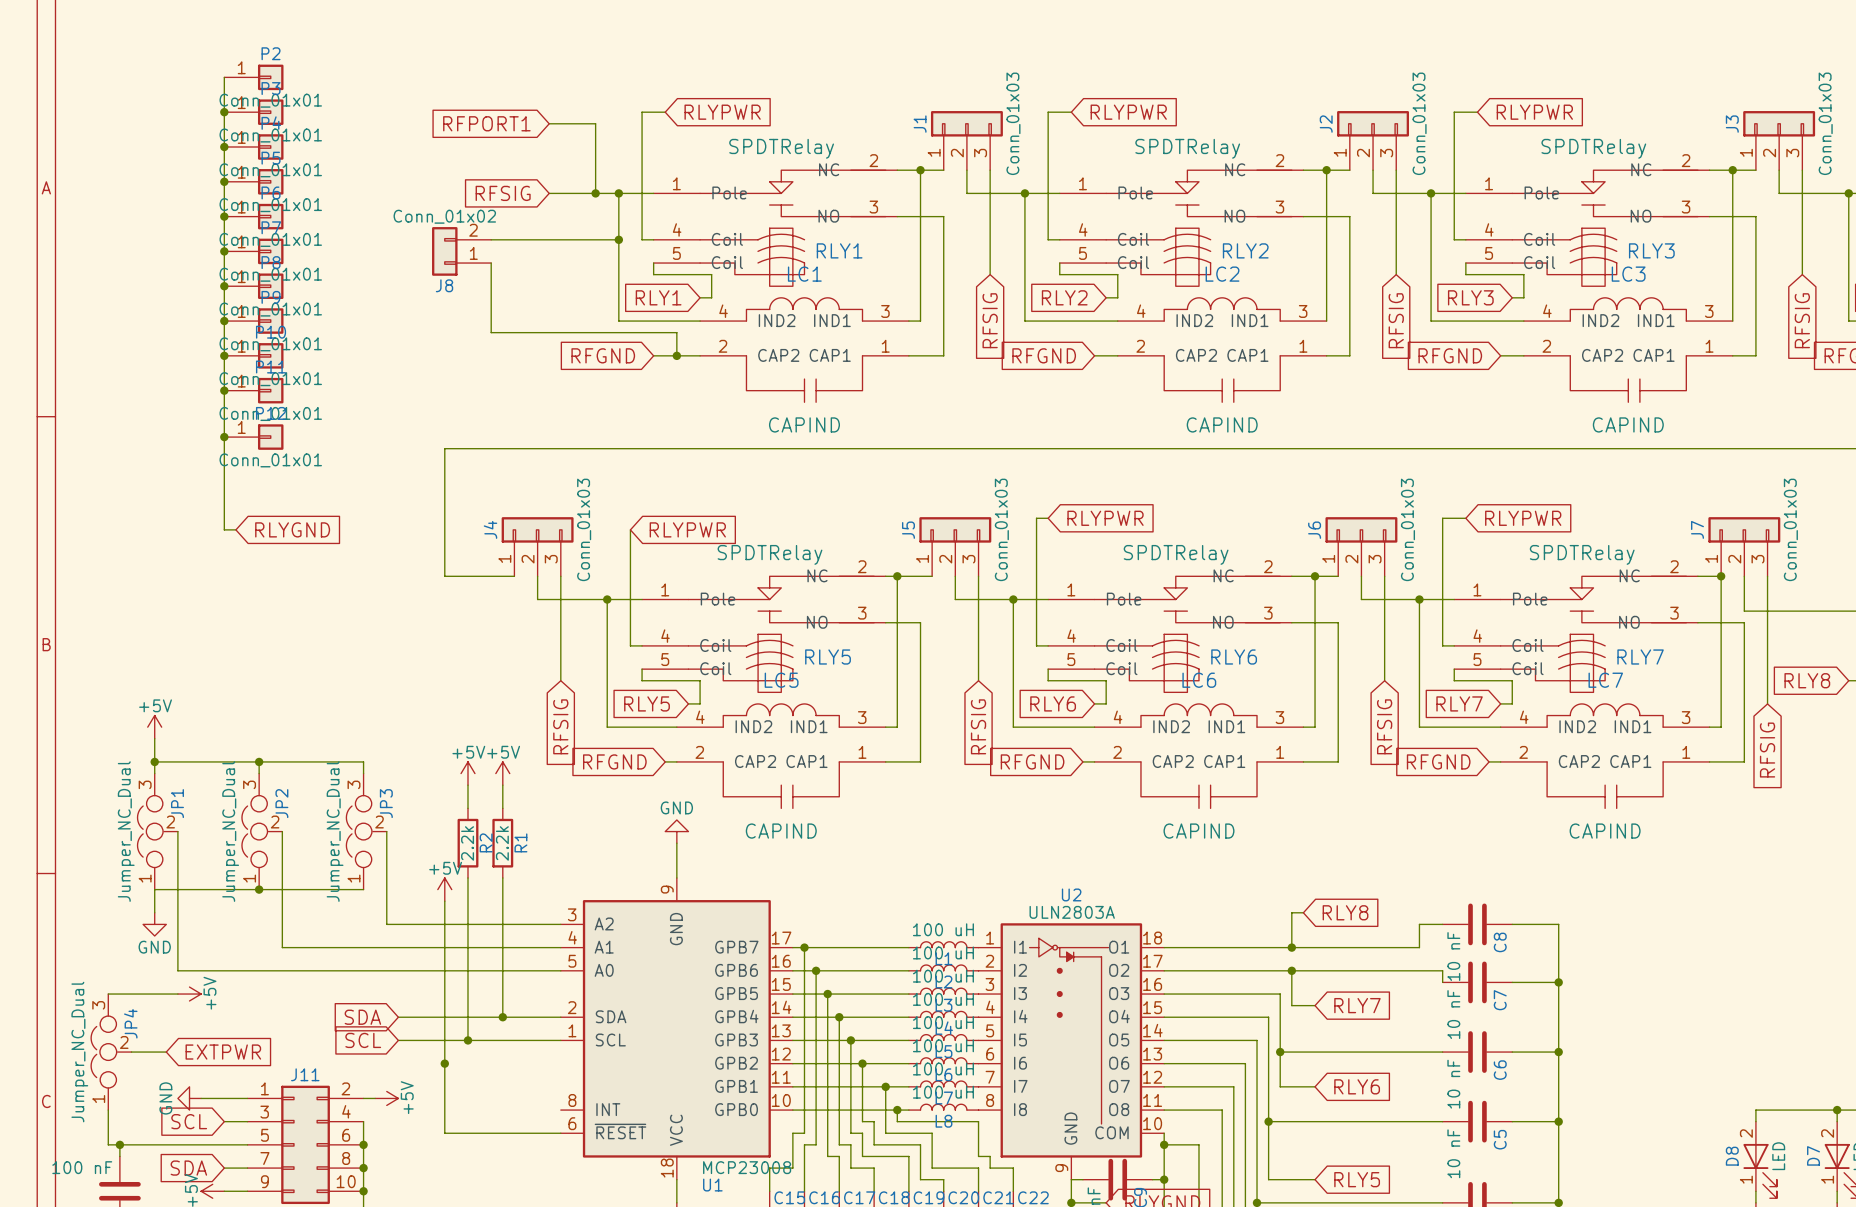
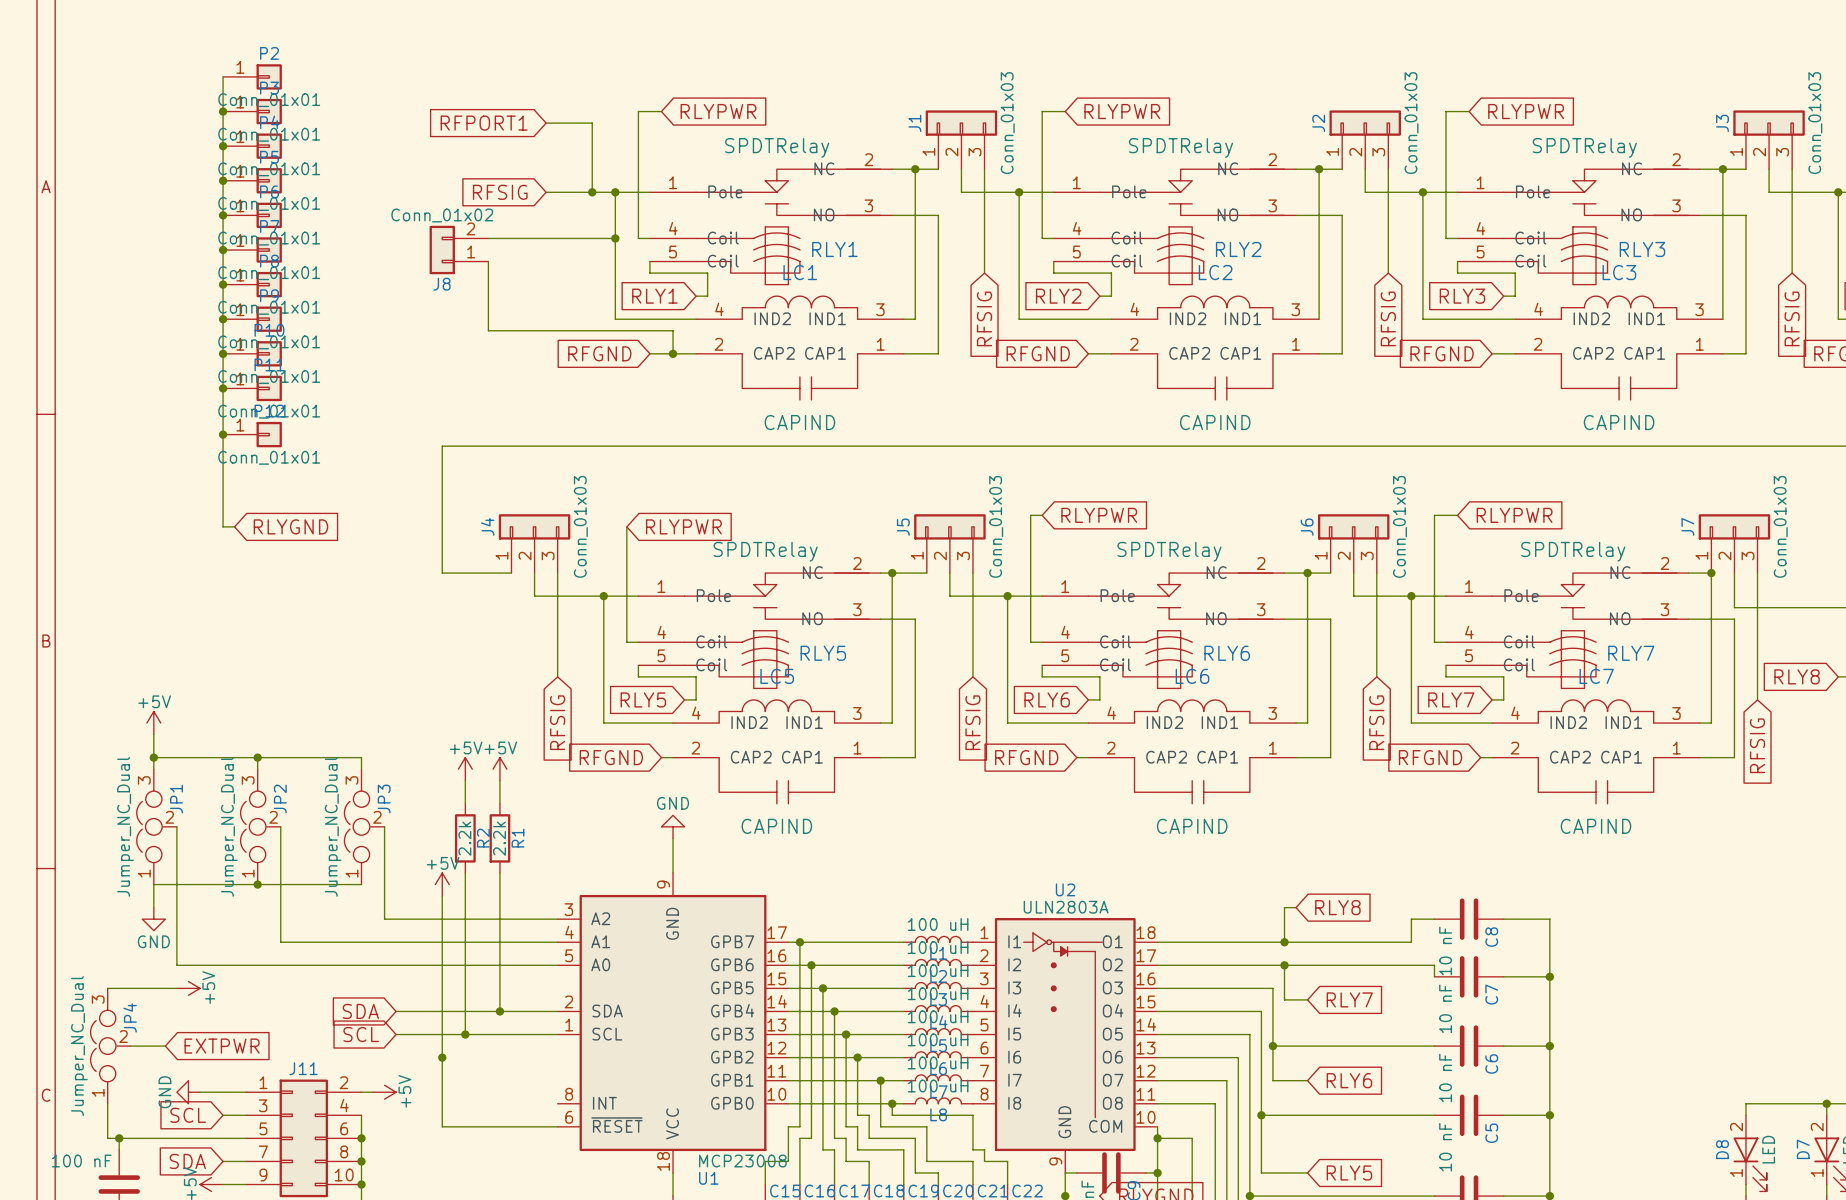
wire: (1071, 1202) (1106, 1202) -> none

